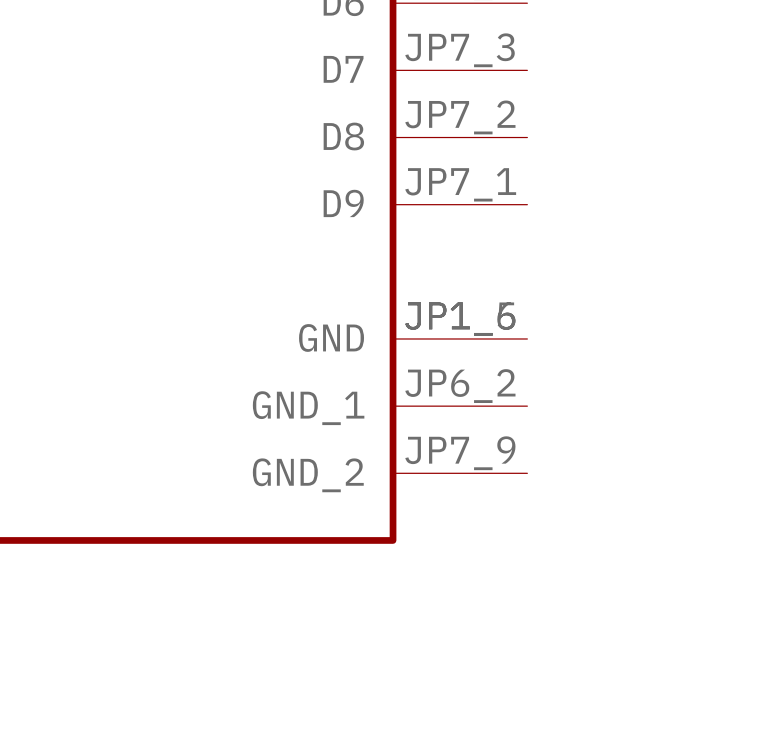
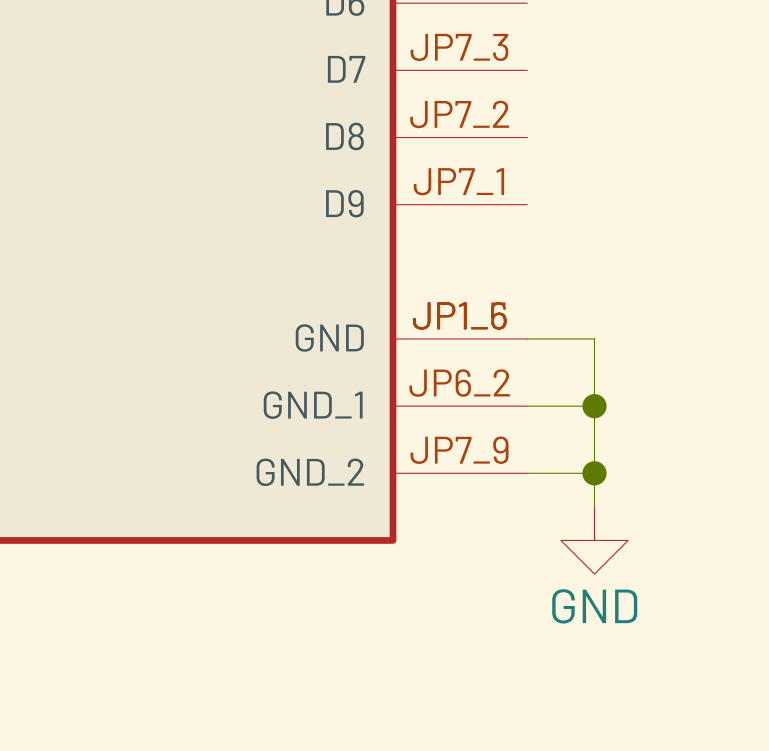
wire: none -> (527, 338) (594, 338) (594, 506)
wire: none -> (527, 406) (594, 406)
junction: none -> (594, 406)
wire: none -> (527, 473) (594, 473)
junction: none -> (594, 473)
power symbol: none -> GND (594, 540)

